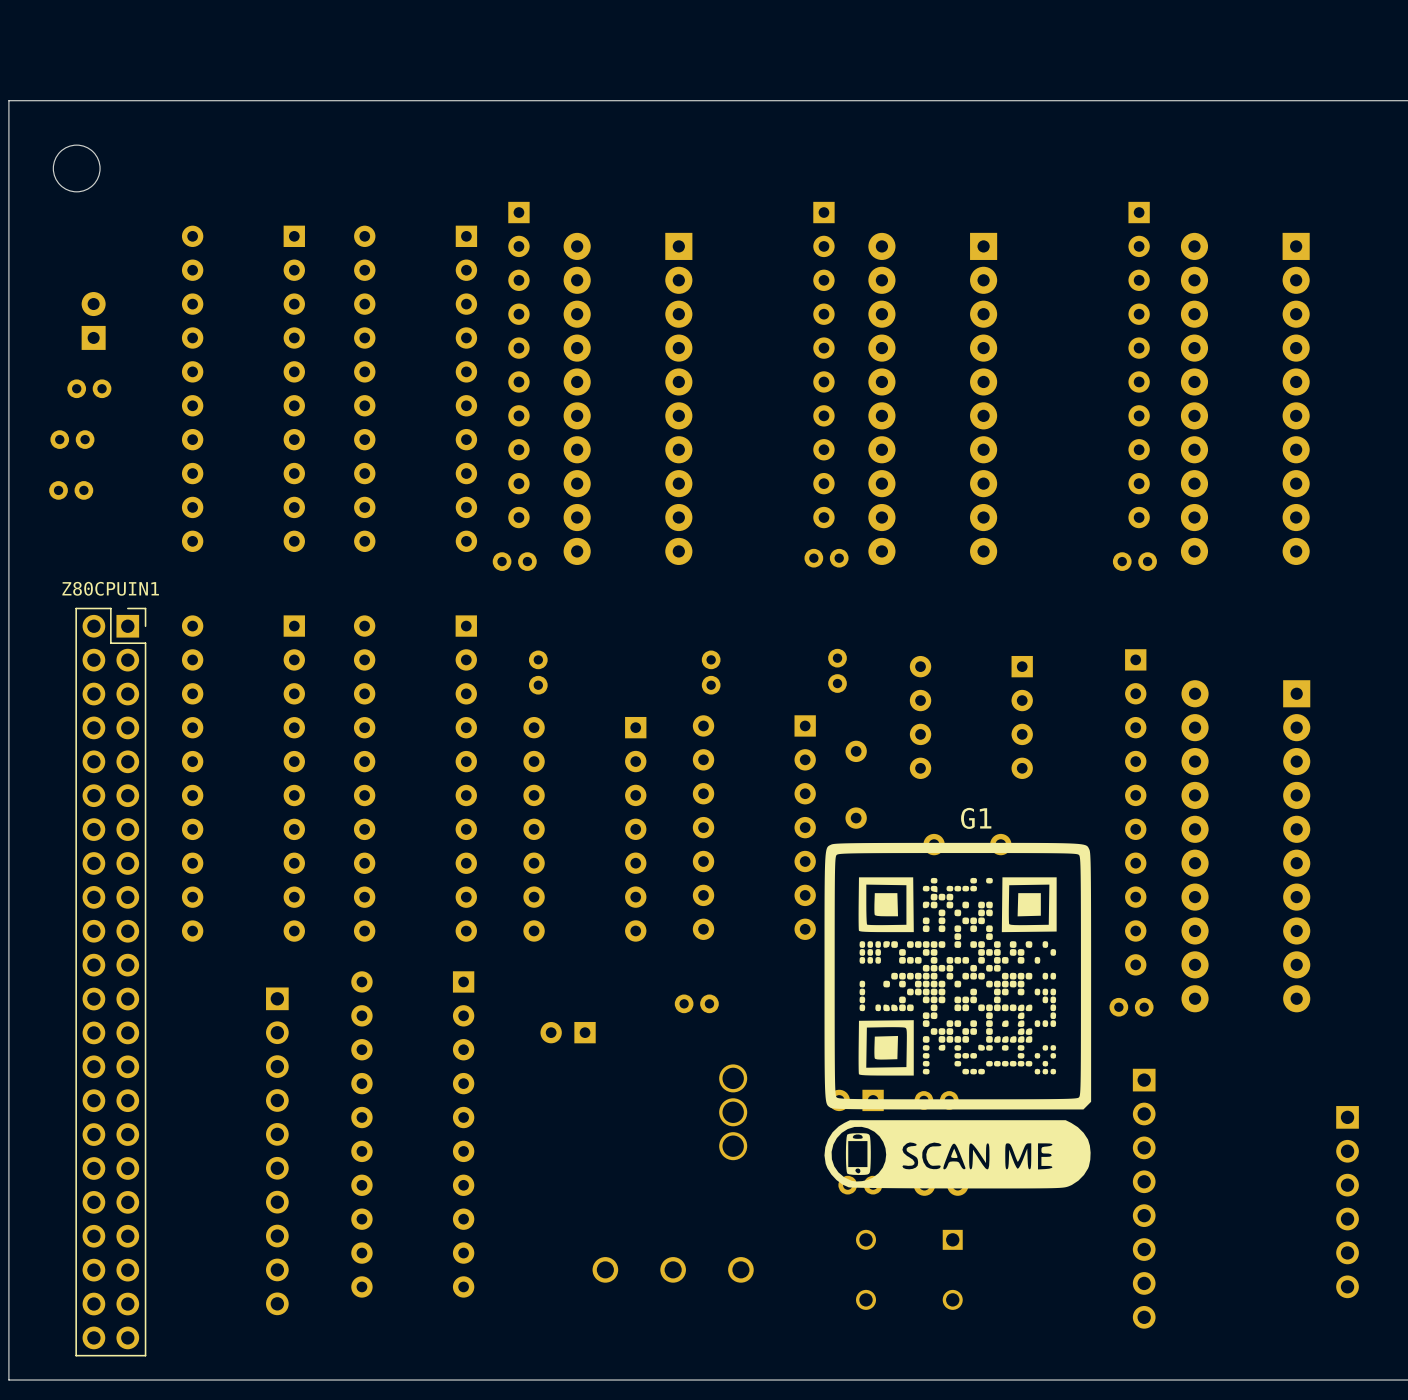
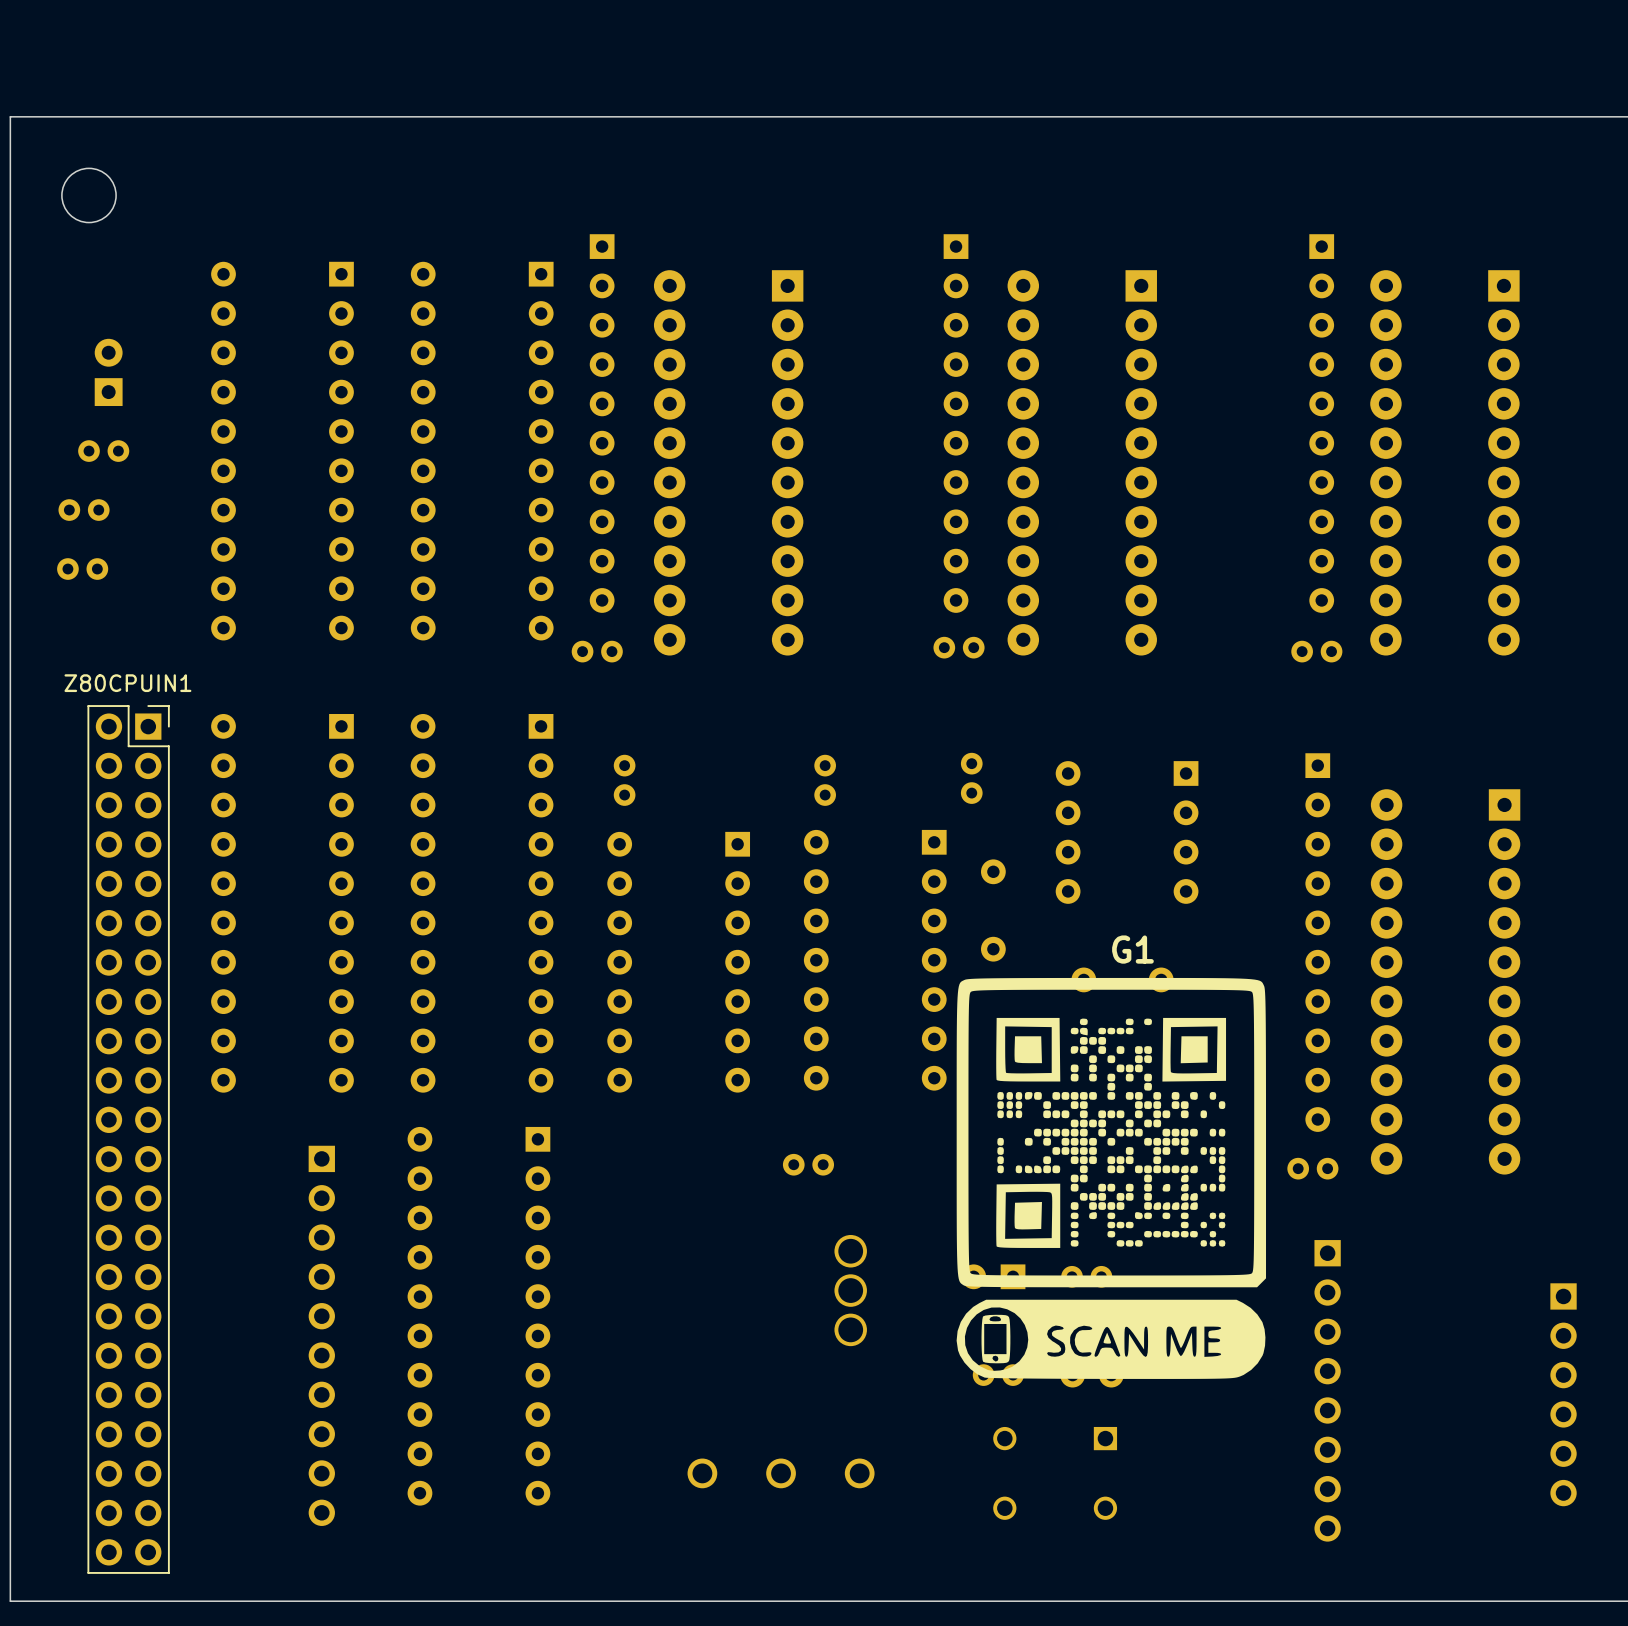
part: (568, 1032) -> none

